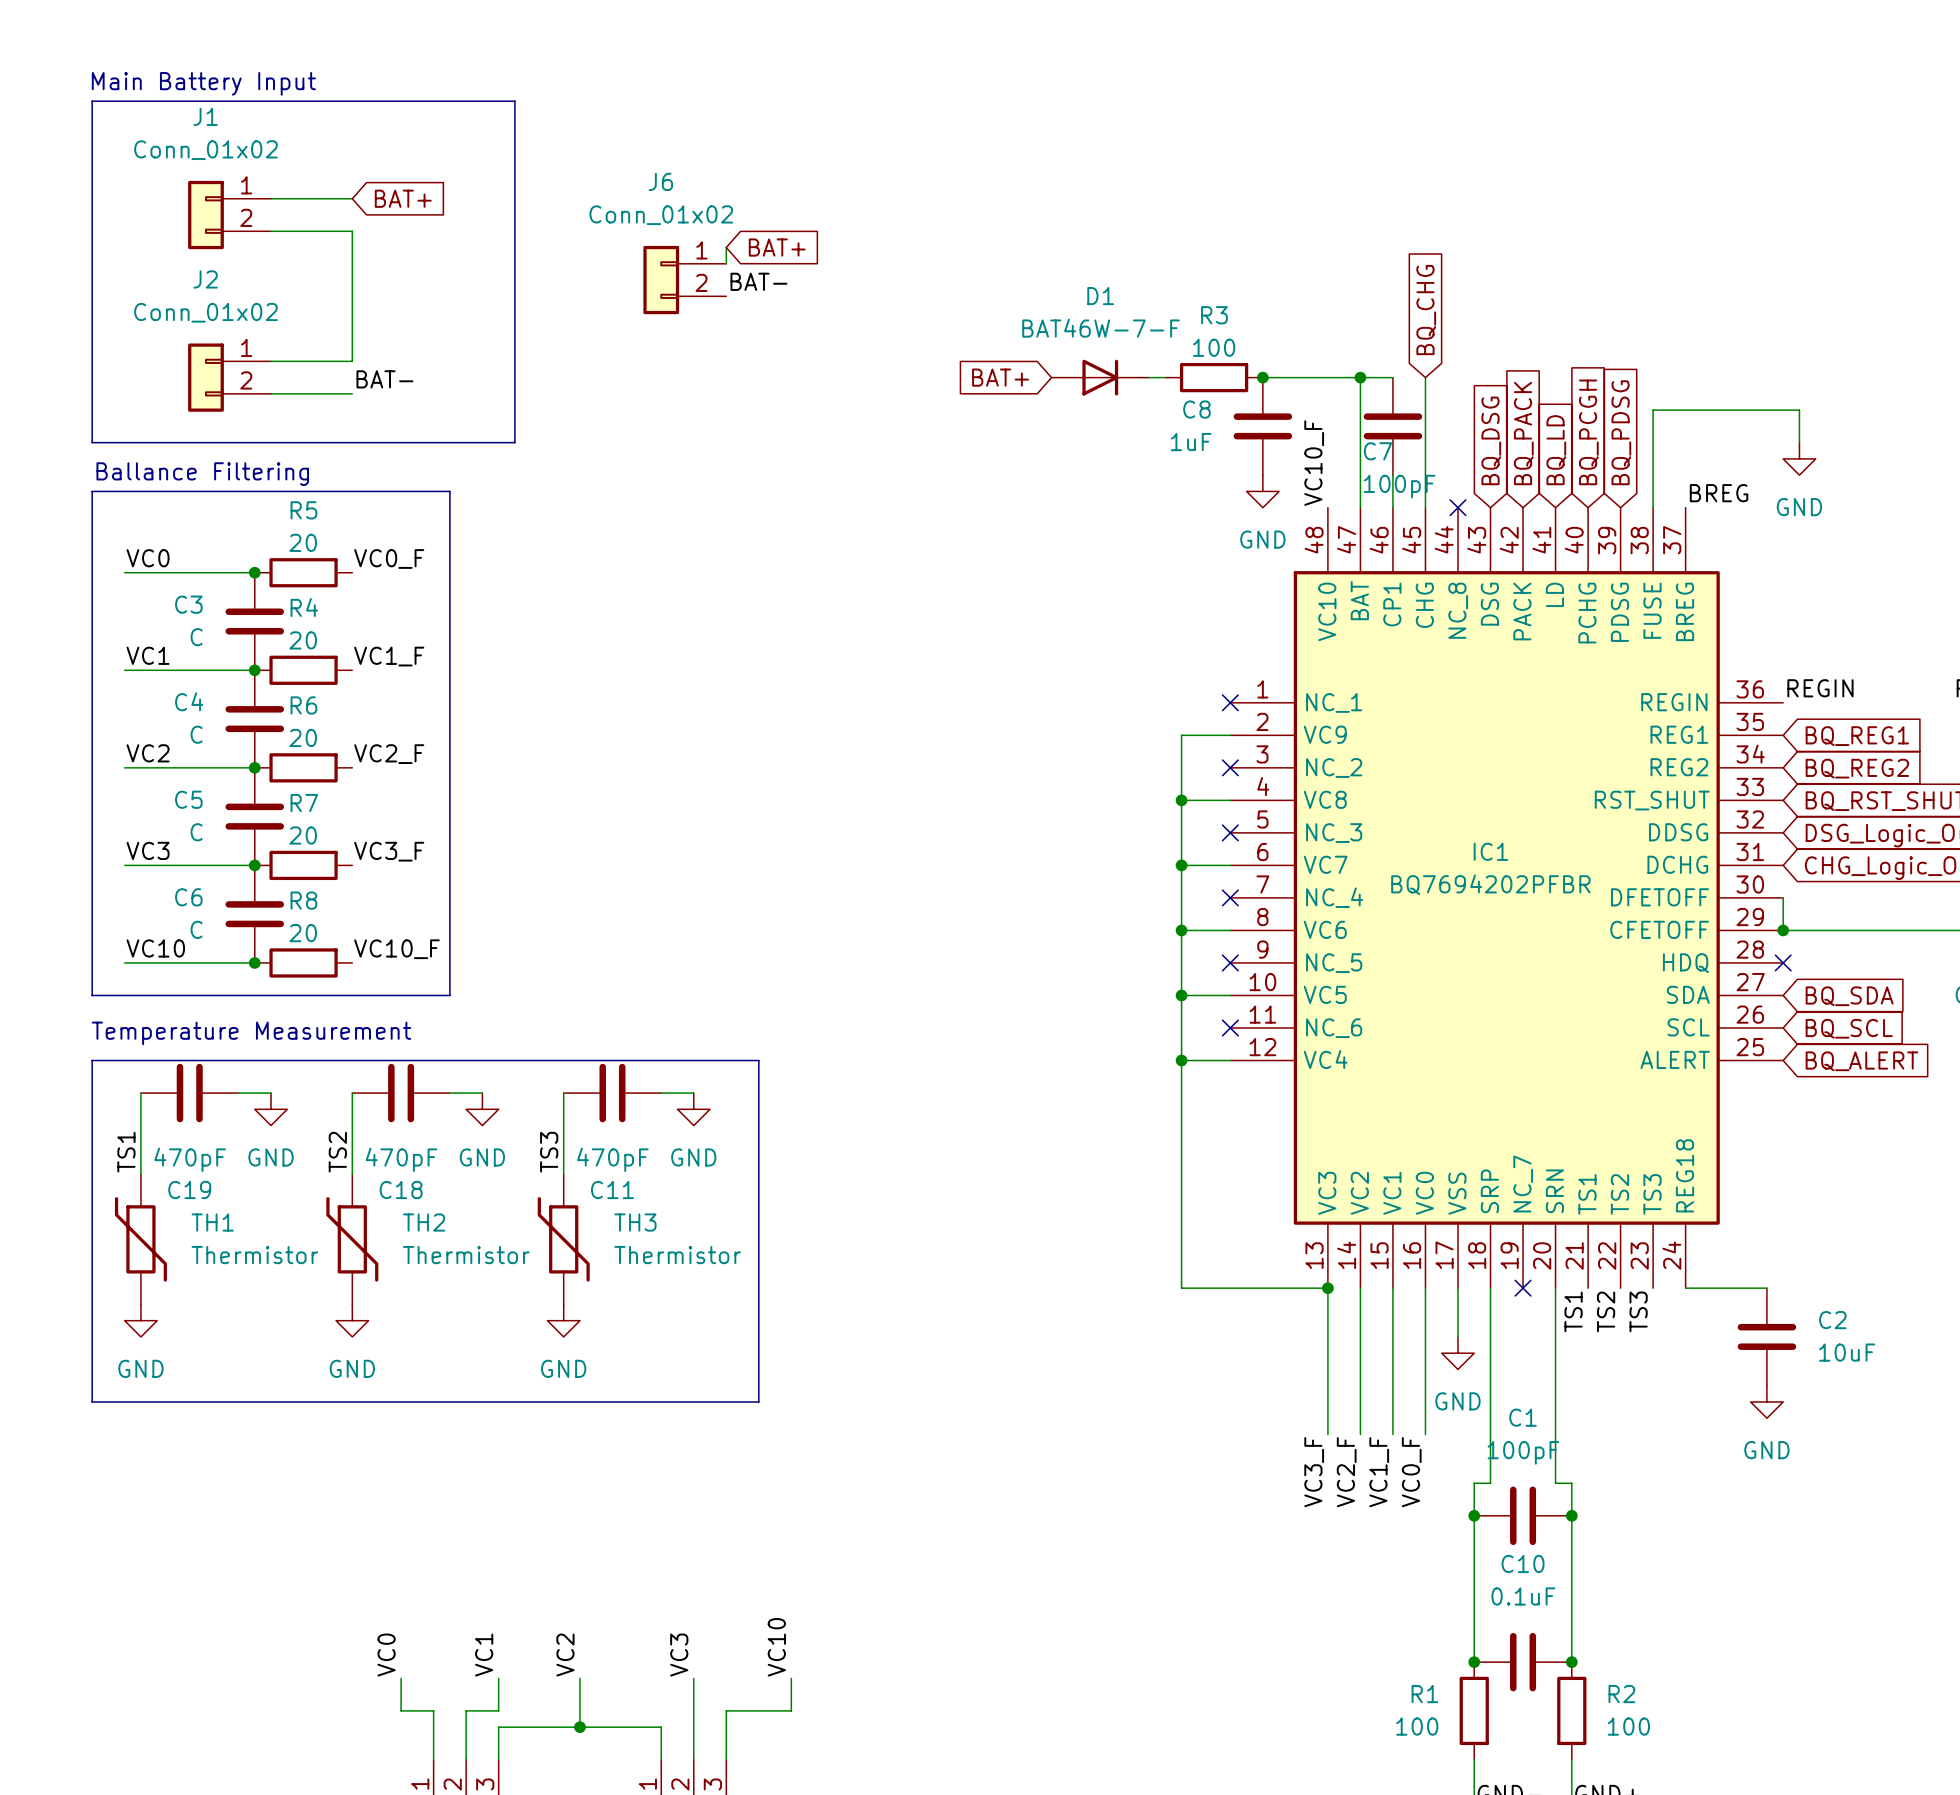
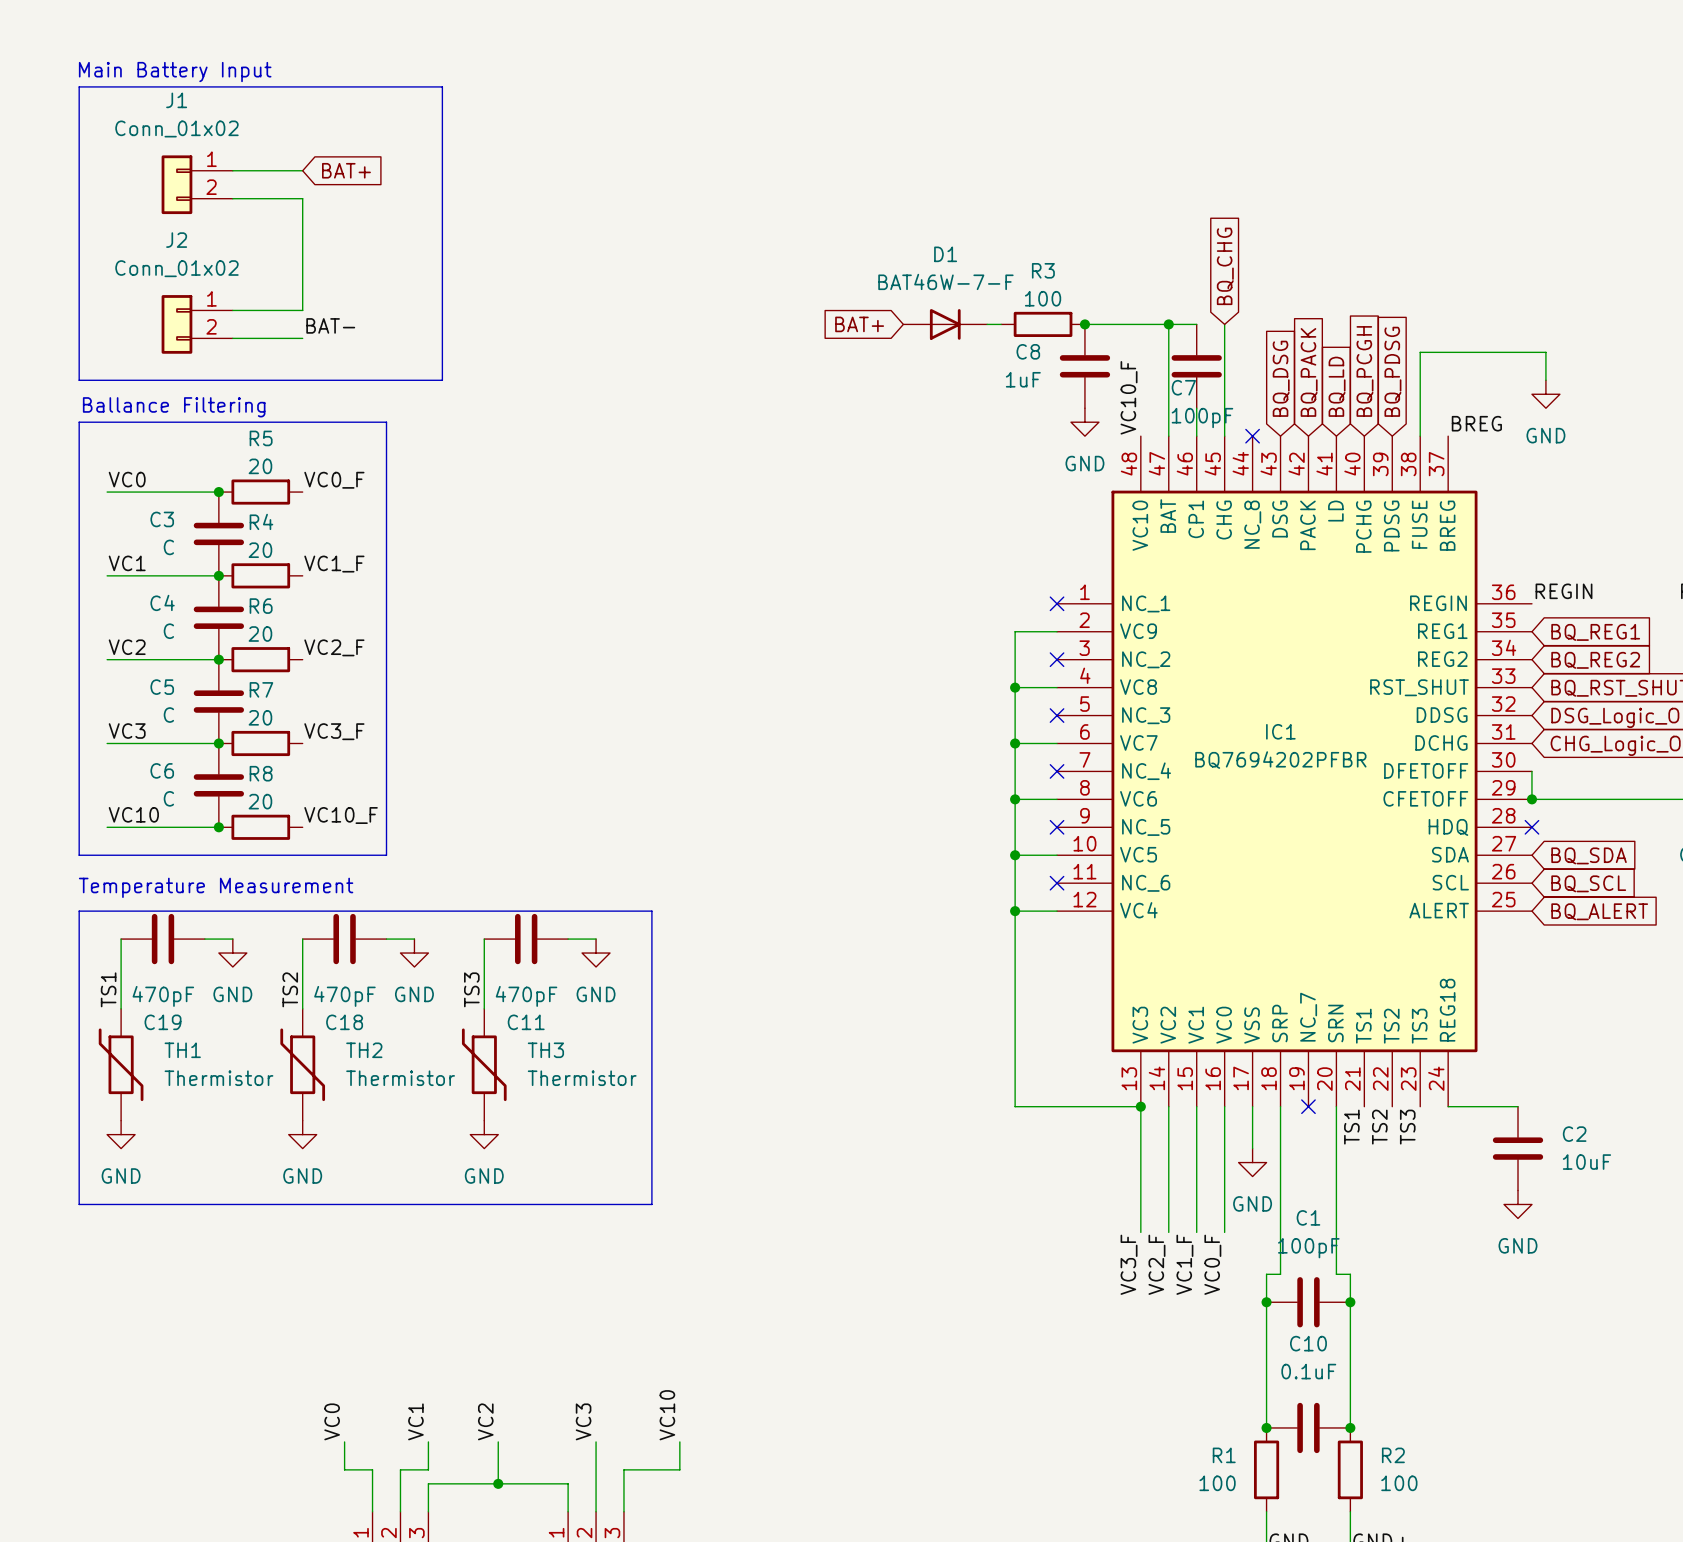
wire: (726, 247) (726, 263) -> none
global label: BAT+ (777, 247) -> none
J6: Conn_01x02 (684, 280) -> none
label: BAT- (758, 281) -> none

